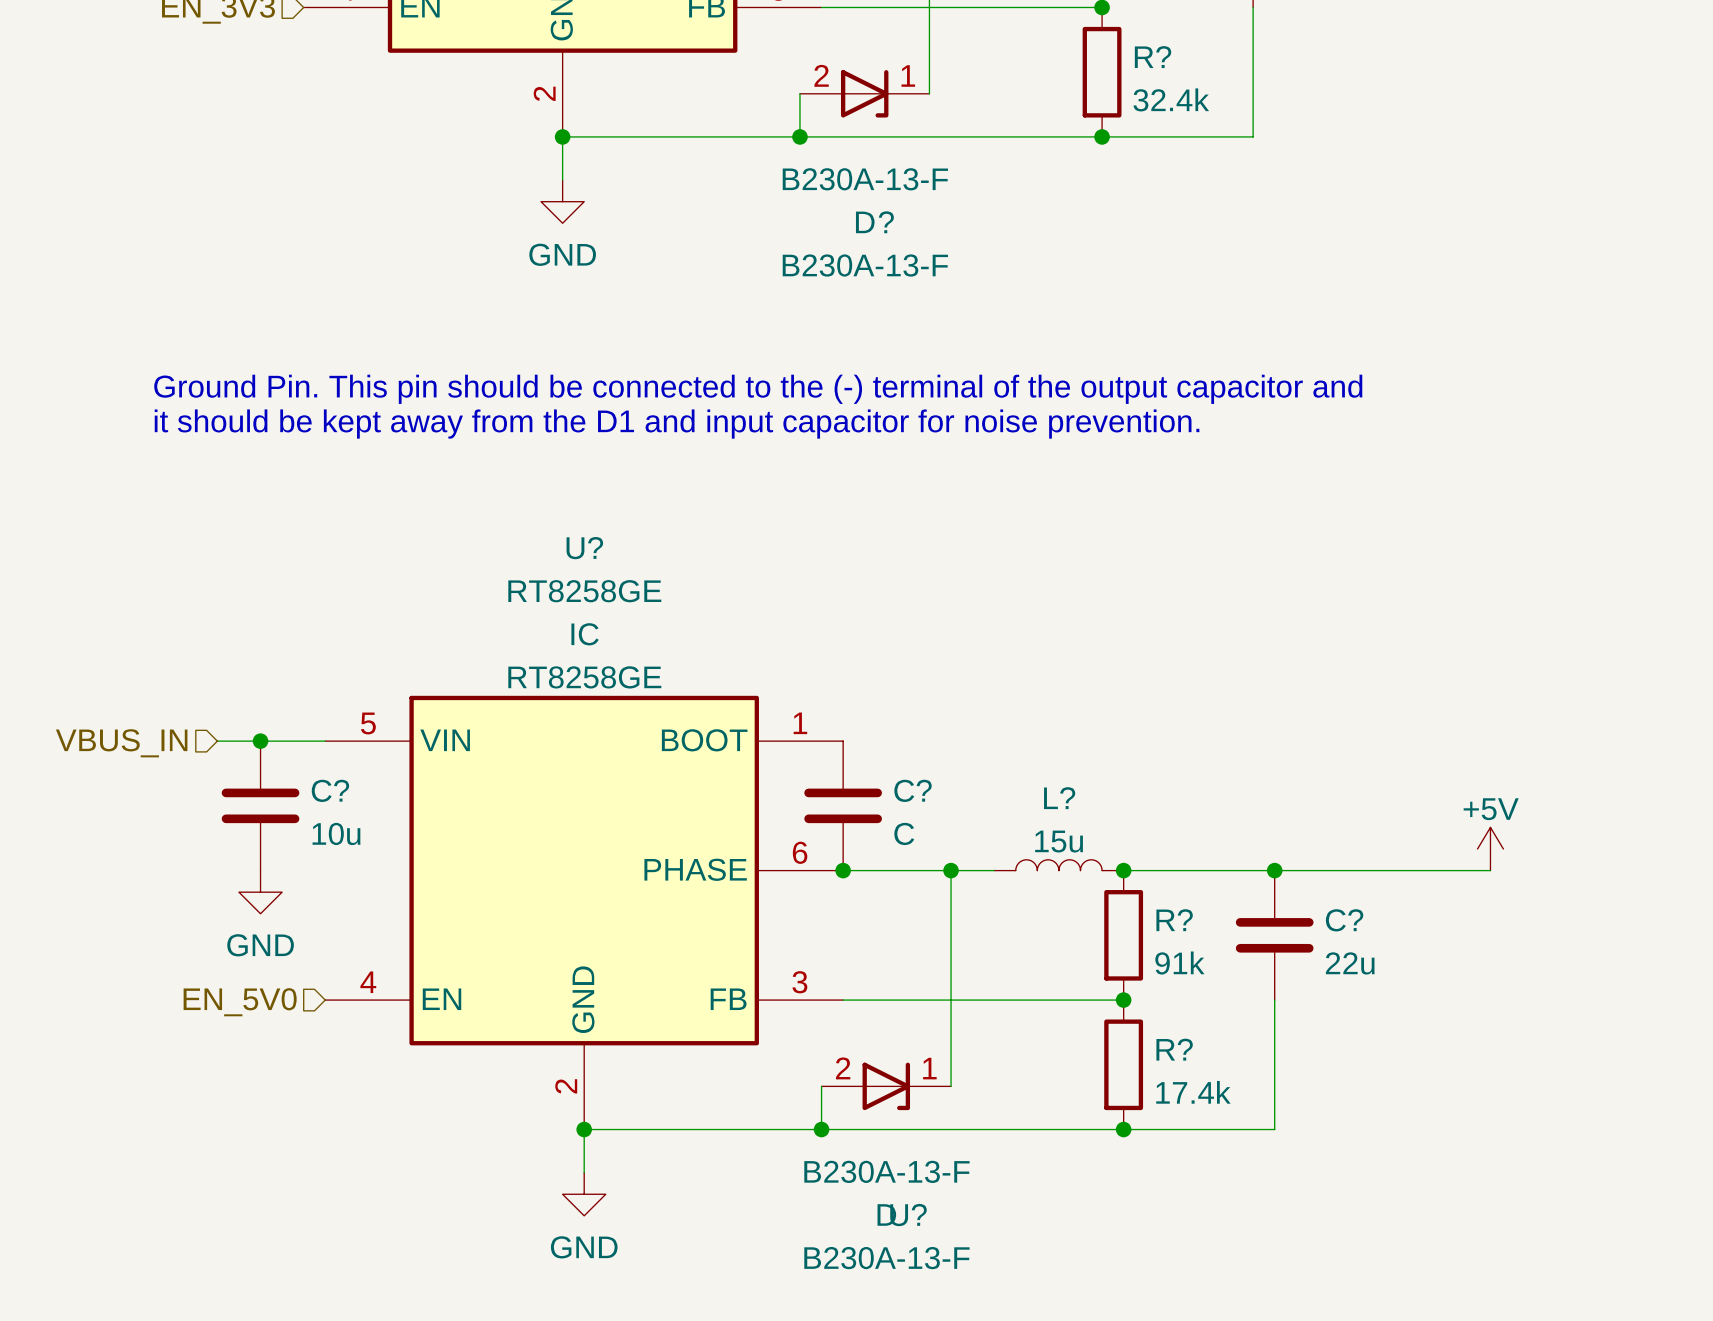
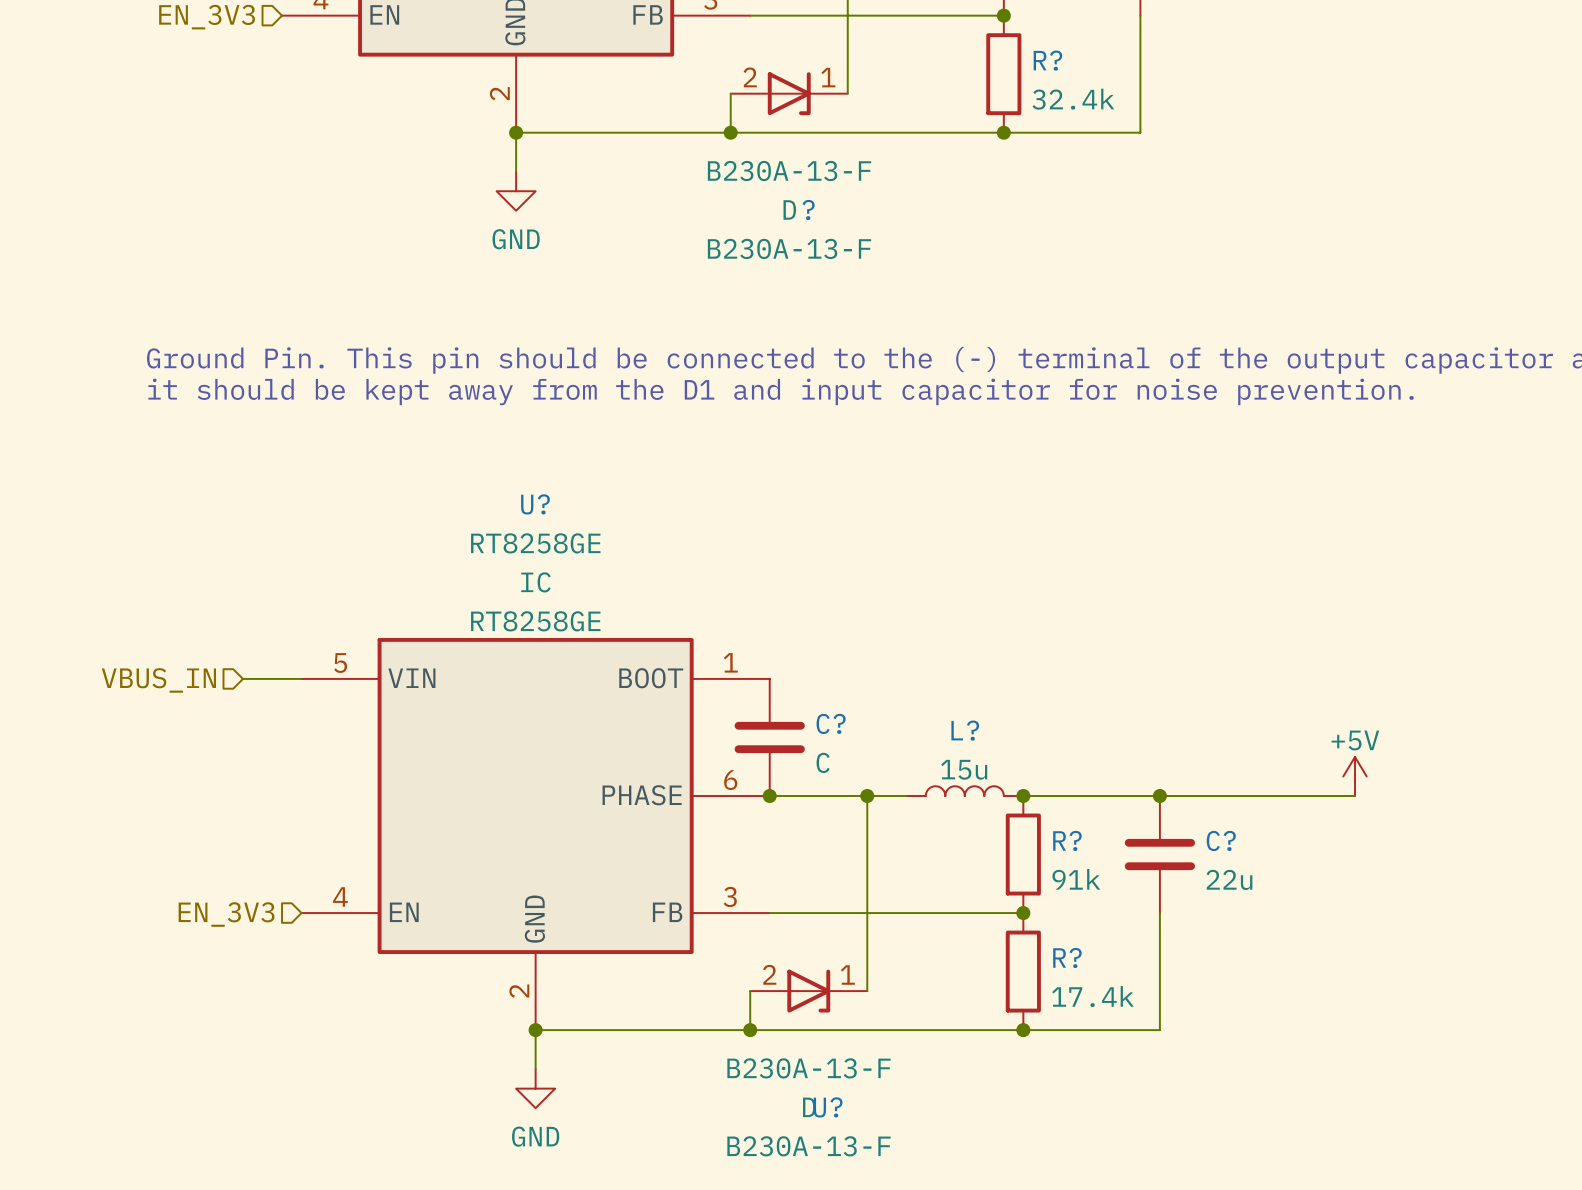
wire: (217, 741) (260, 741) -> none
junction: (260, 741) -> none
hierarchical label position: VBUS_IN (121, 743) -> VBUS_IN (158, 680)
C?: 10u (260, 805) -> none
power symbol: GND (260, 892) -> none
hierarchical label: EN_5V0 (240, 1002) -> EN_3V3 (226, 914)

